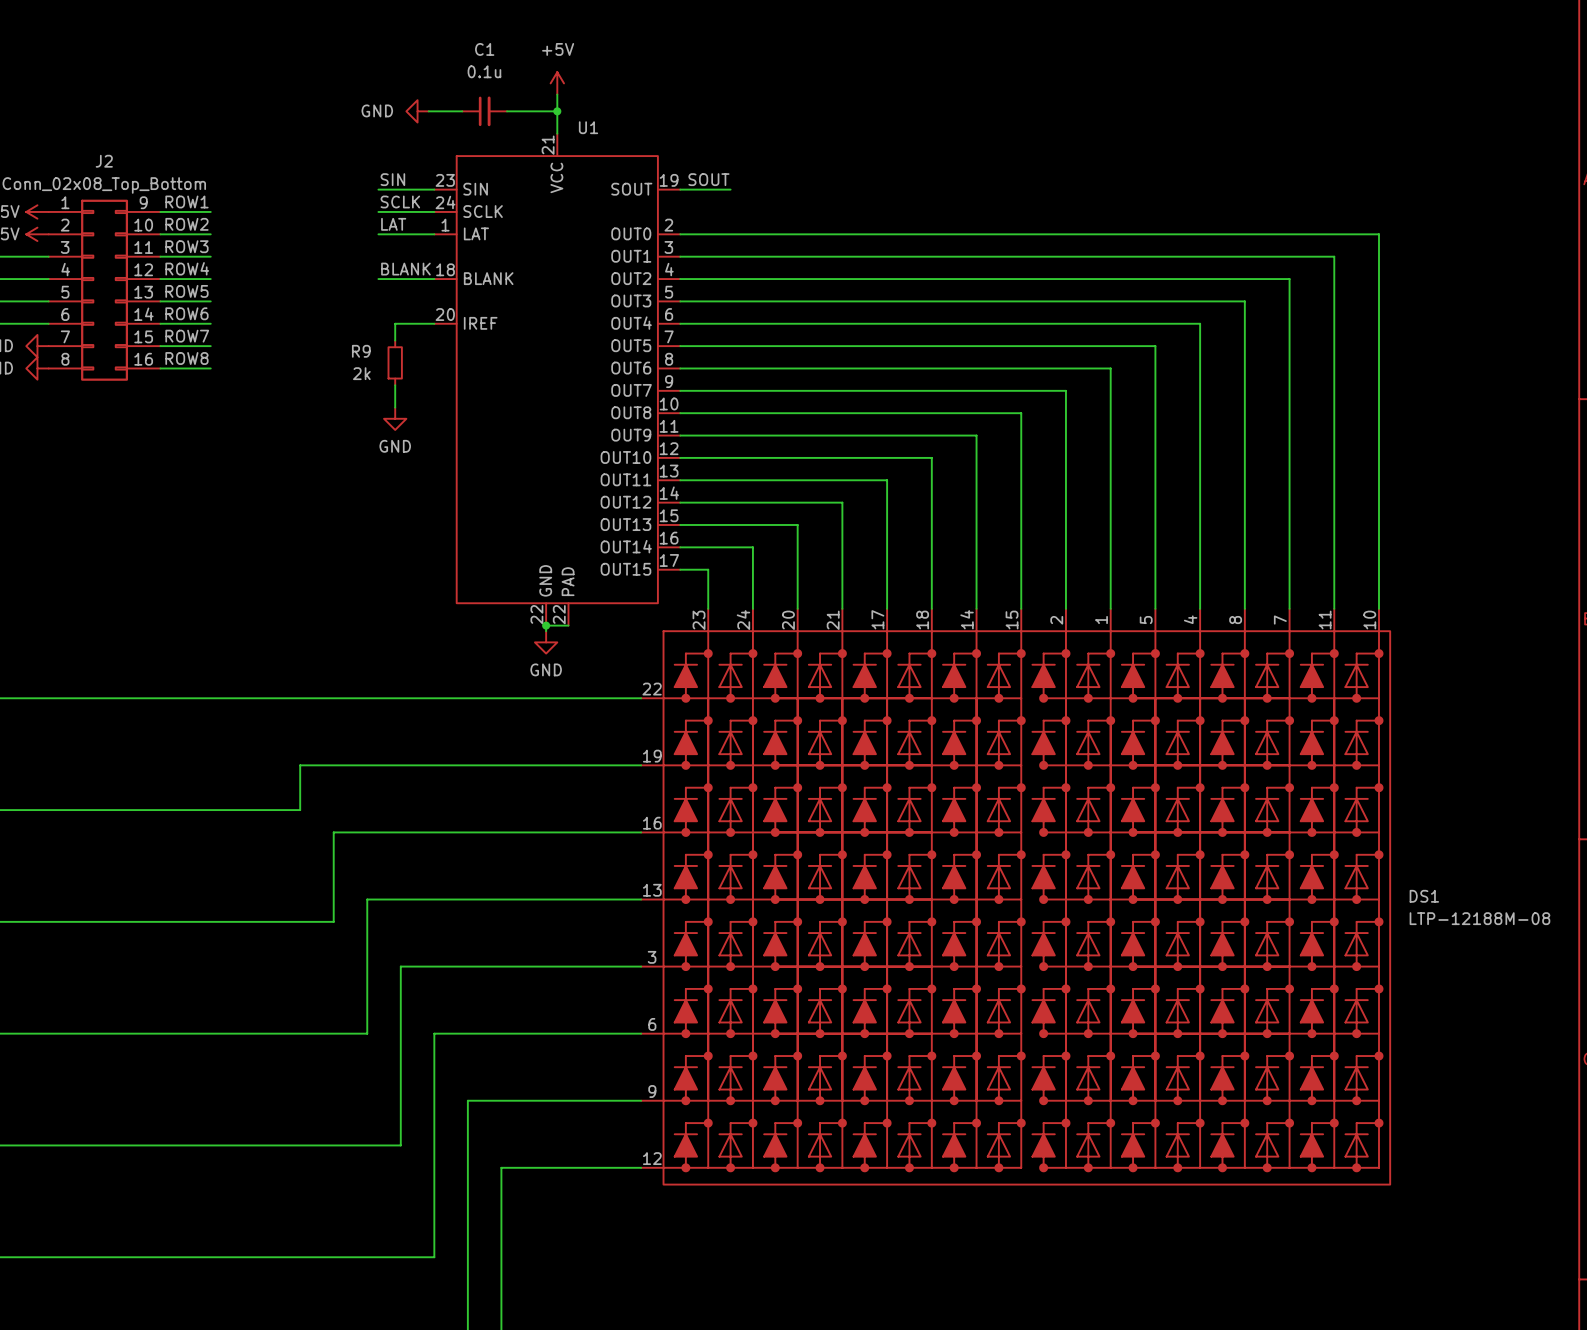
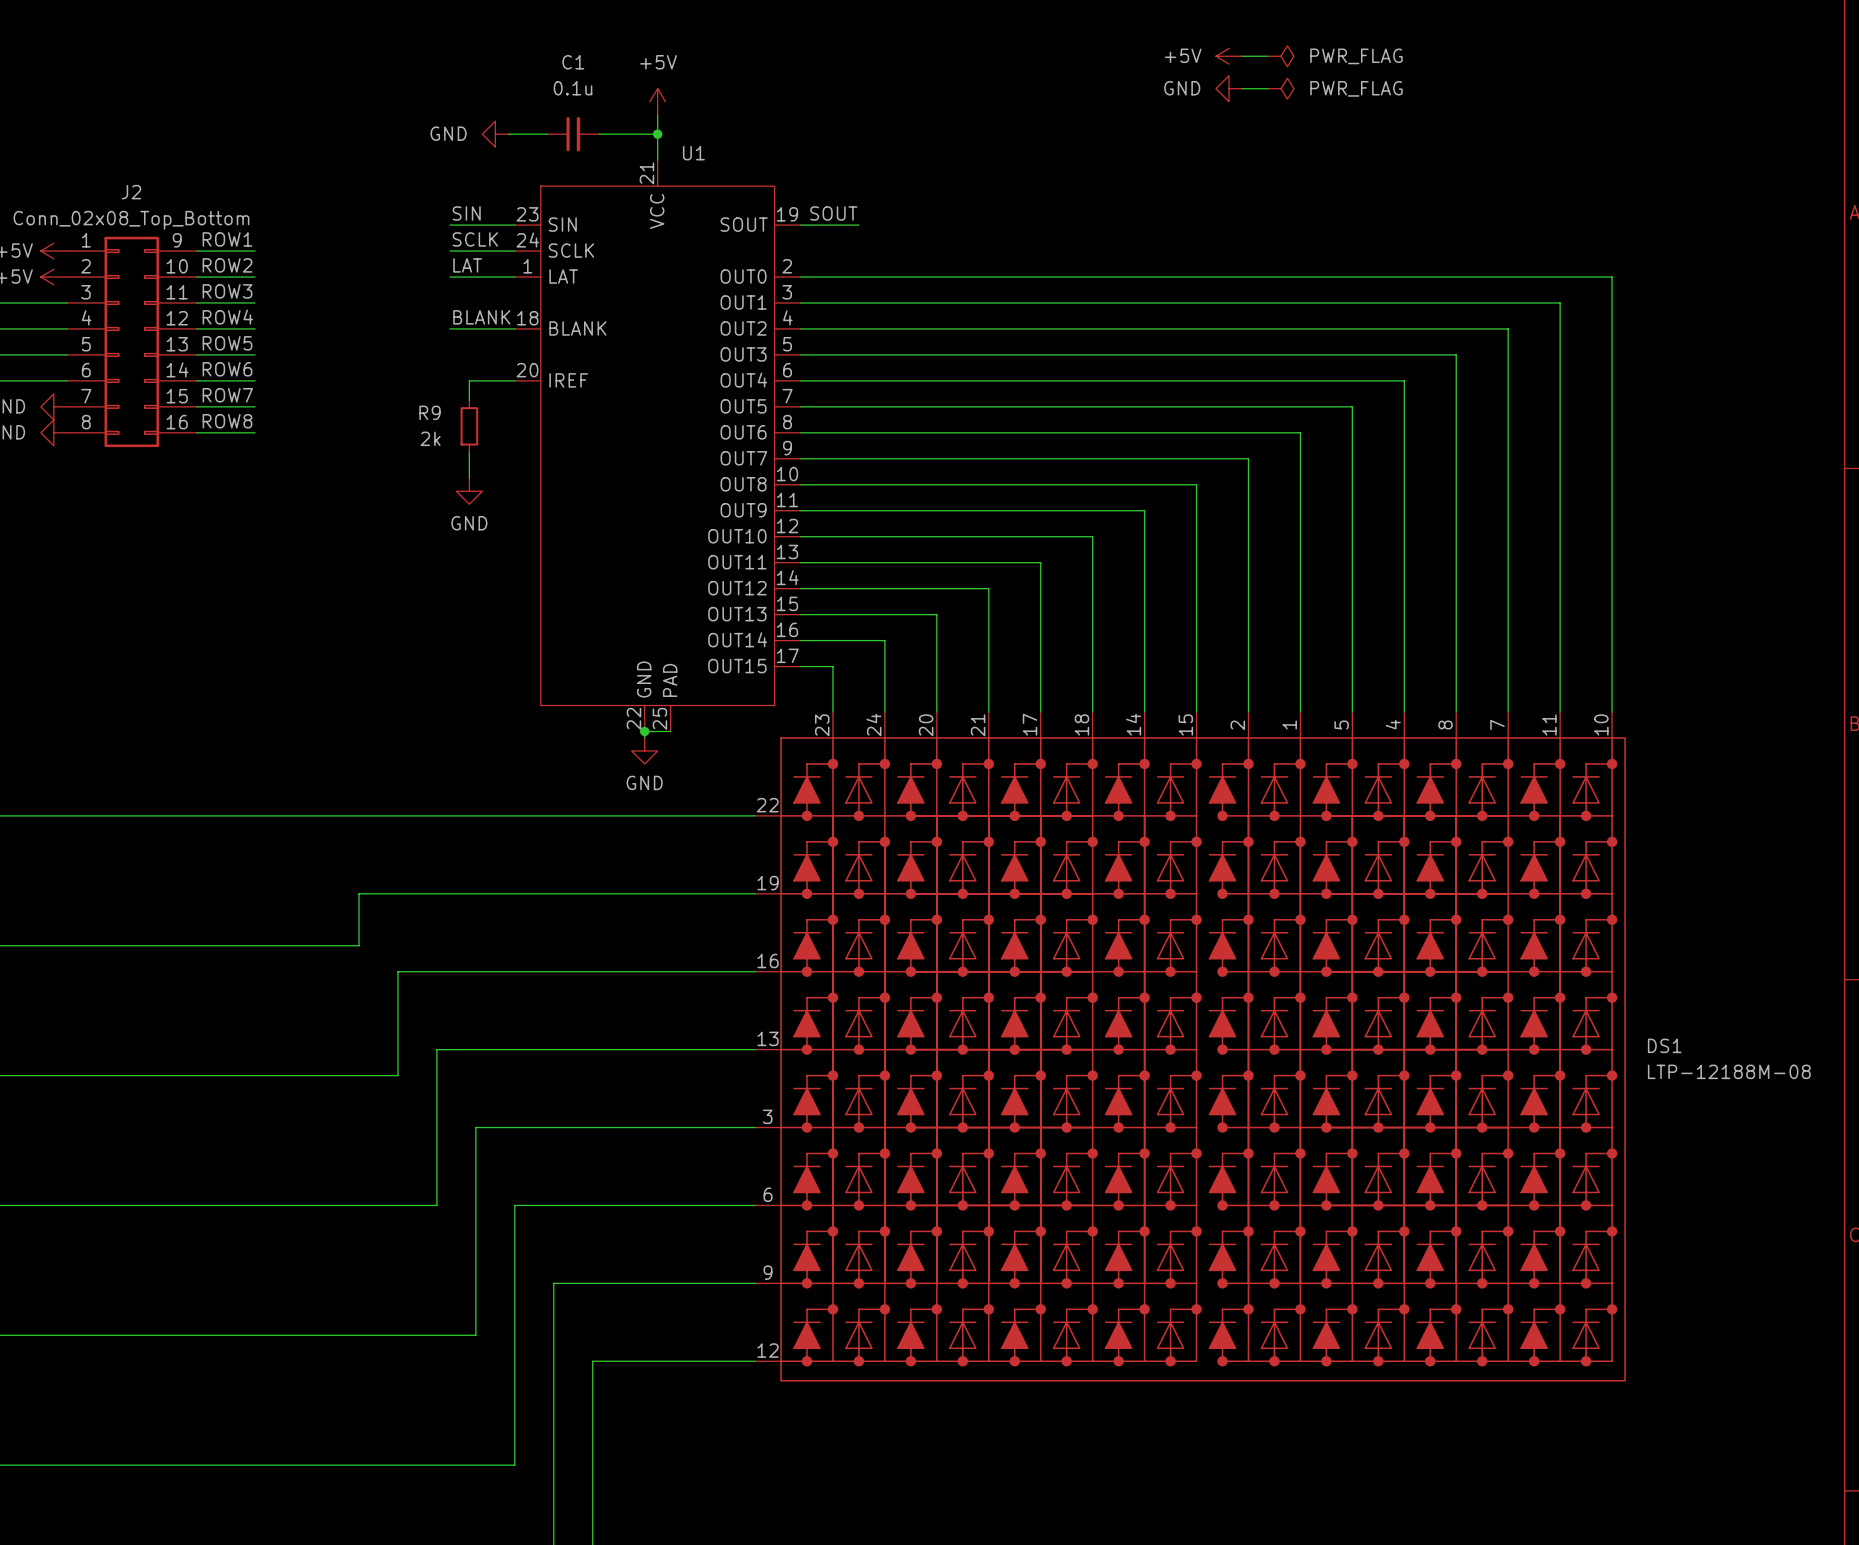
power symbol: none -> +5V (1229, 56)
wire: none -> (1241, 56) (1267, 56)
power symbol: none -> PWR_FLAG (1280, 56)
power symbol: none -> GND (1229, 88)
wire: none -> (1241, 88) (1267, 88)
power symbol: none -> PWR_FLAG (1280, 88)
U1 pin number: 22 (559, 614) -> 25 (659, 718)

